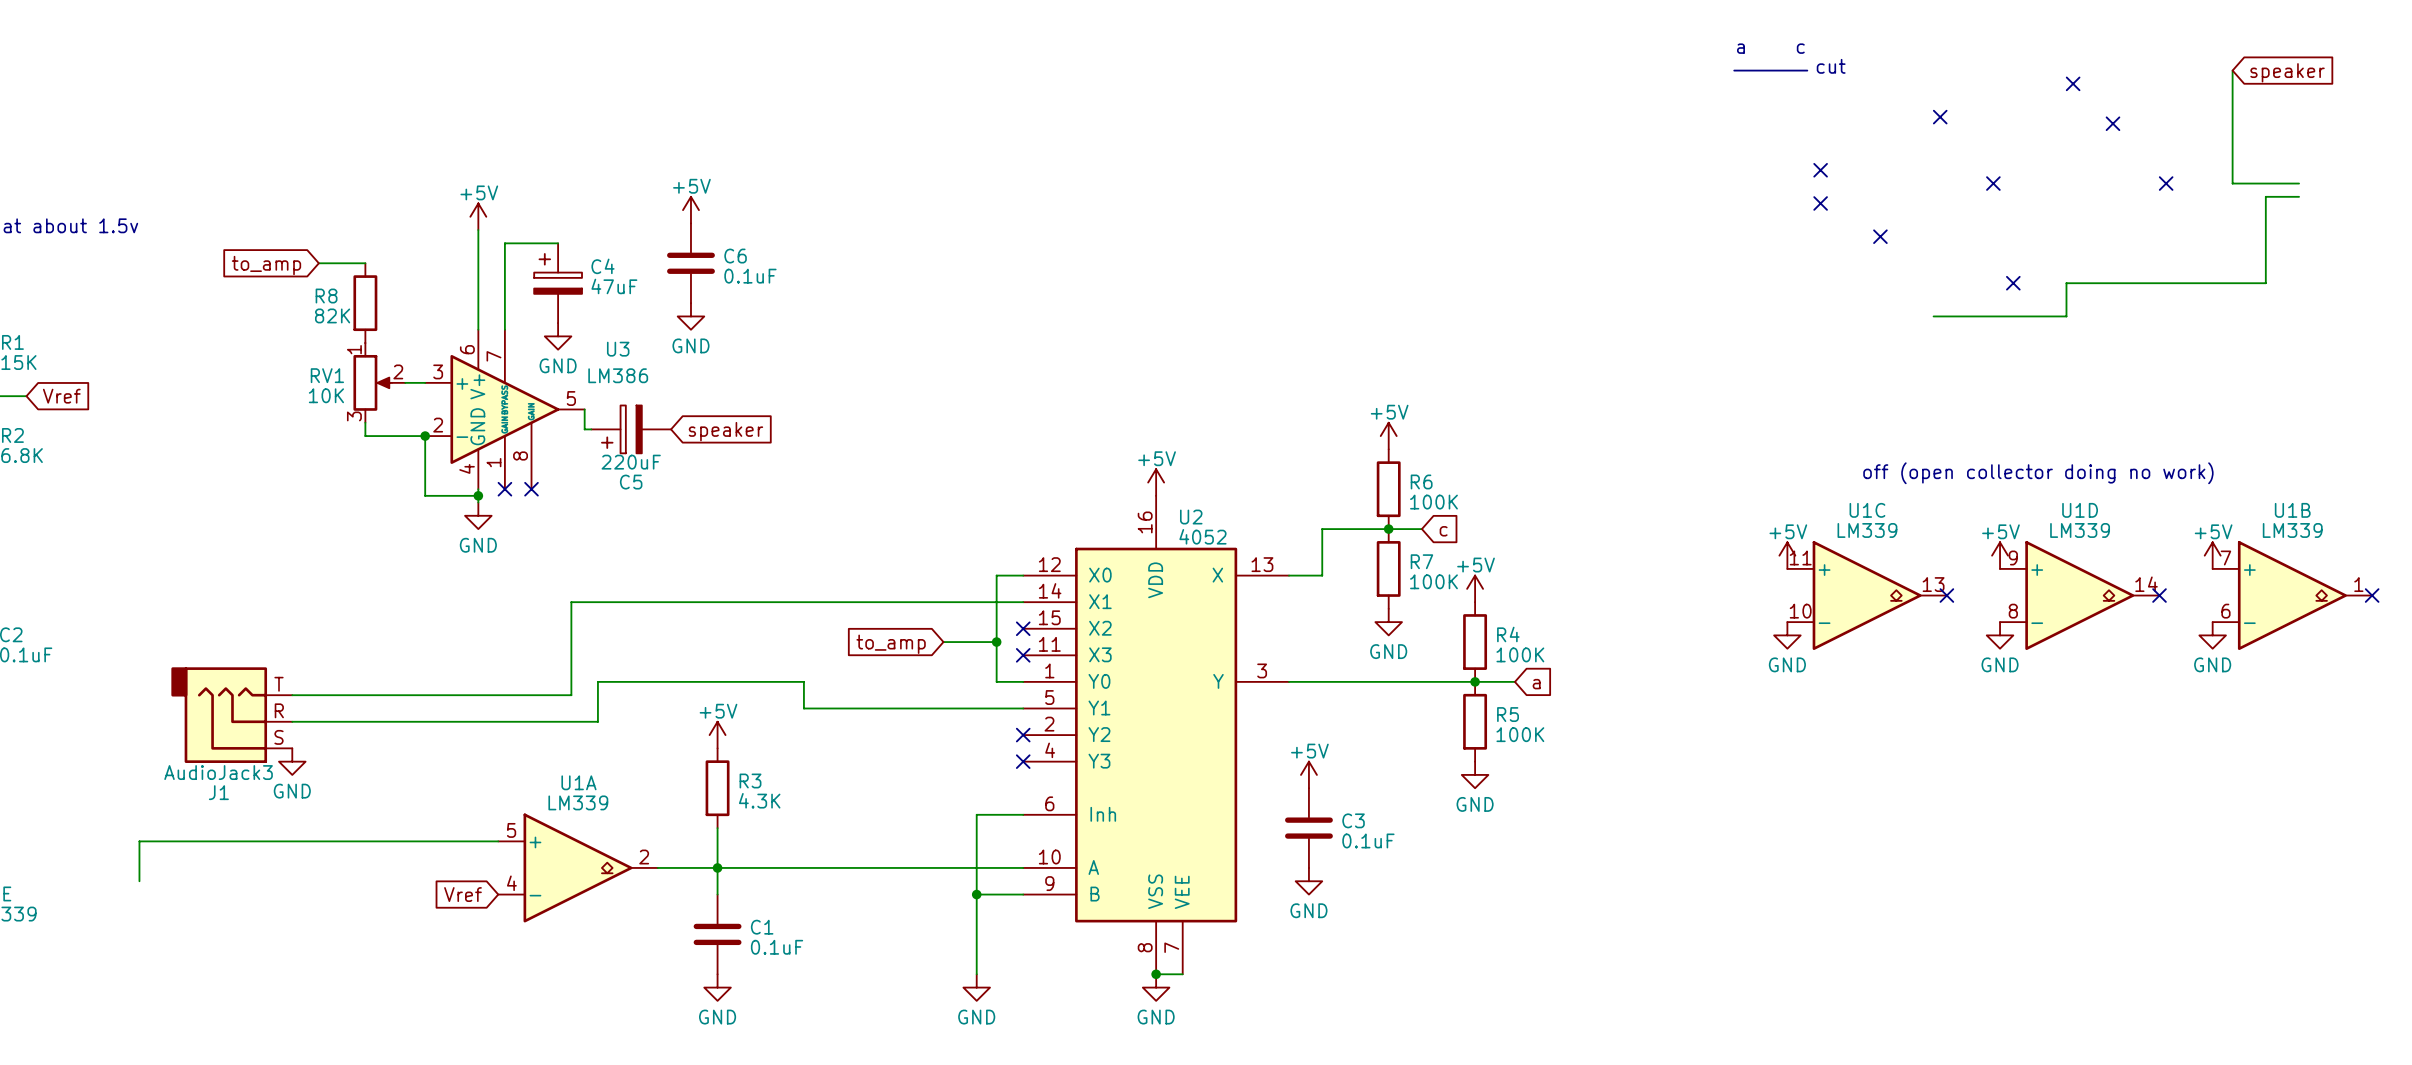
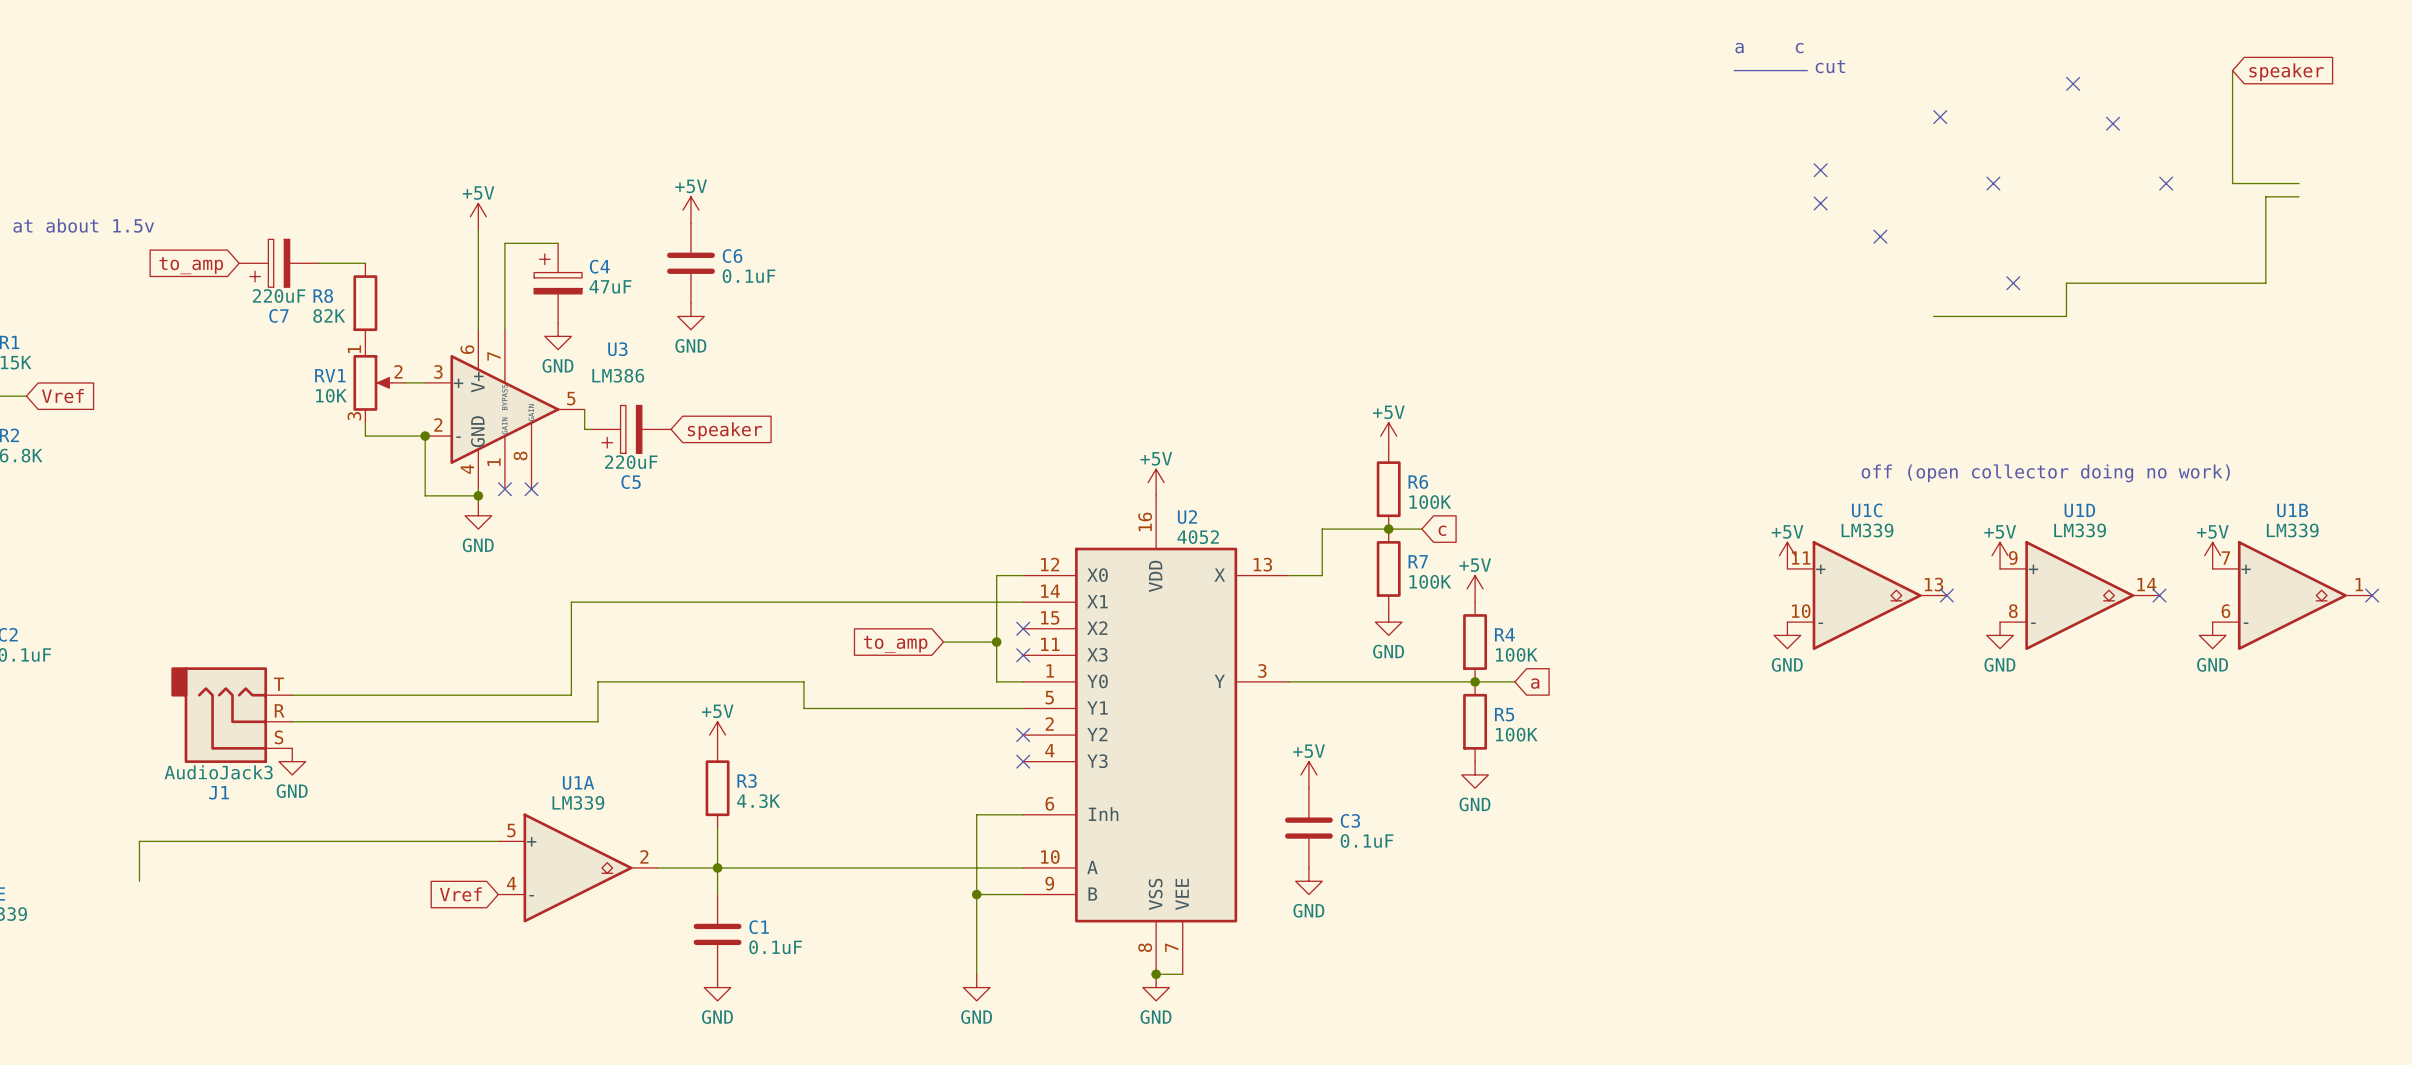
C7: none -> 220uF (279, 263)
global label position: to_amp (266, 265) -> to_amp (191, 265)

